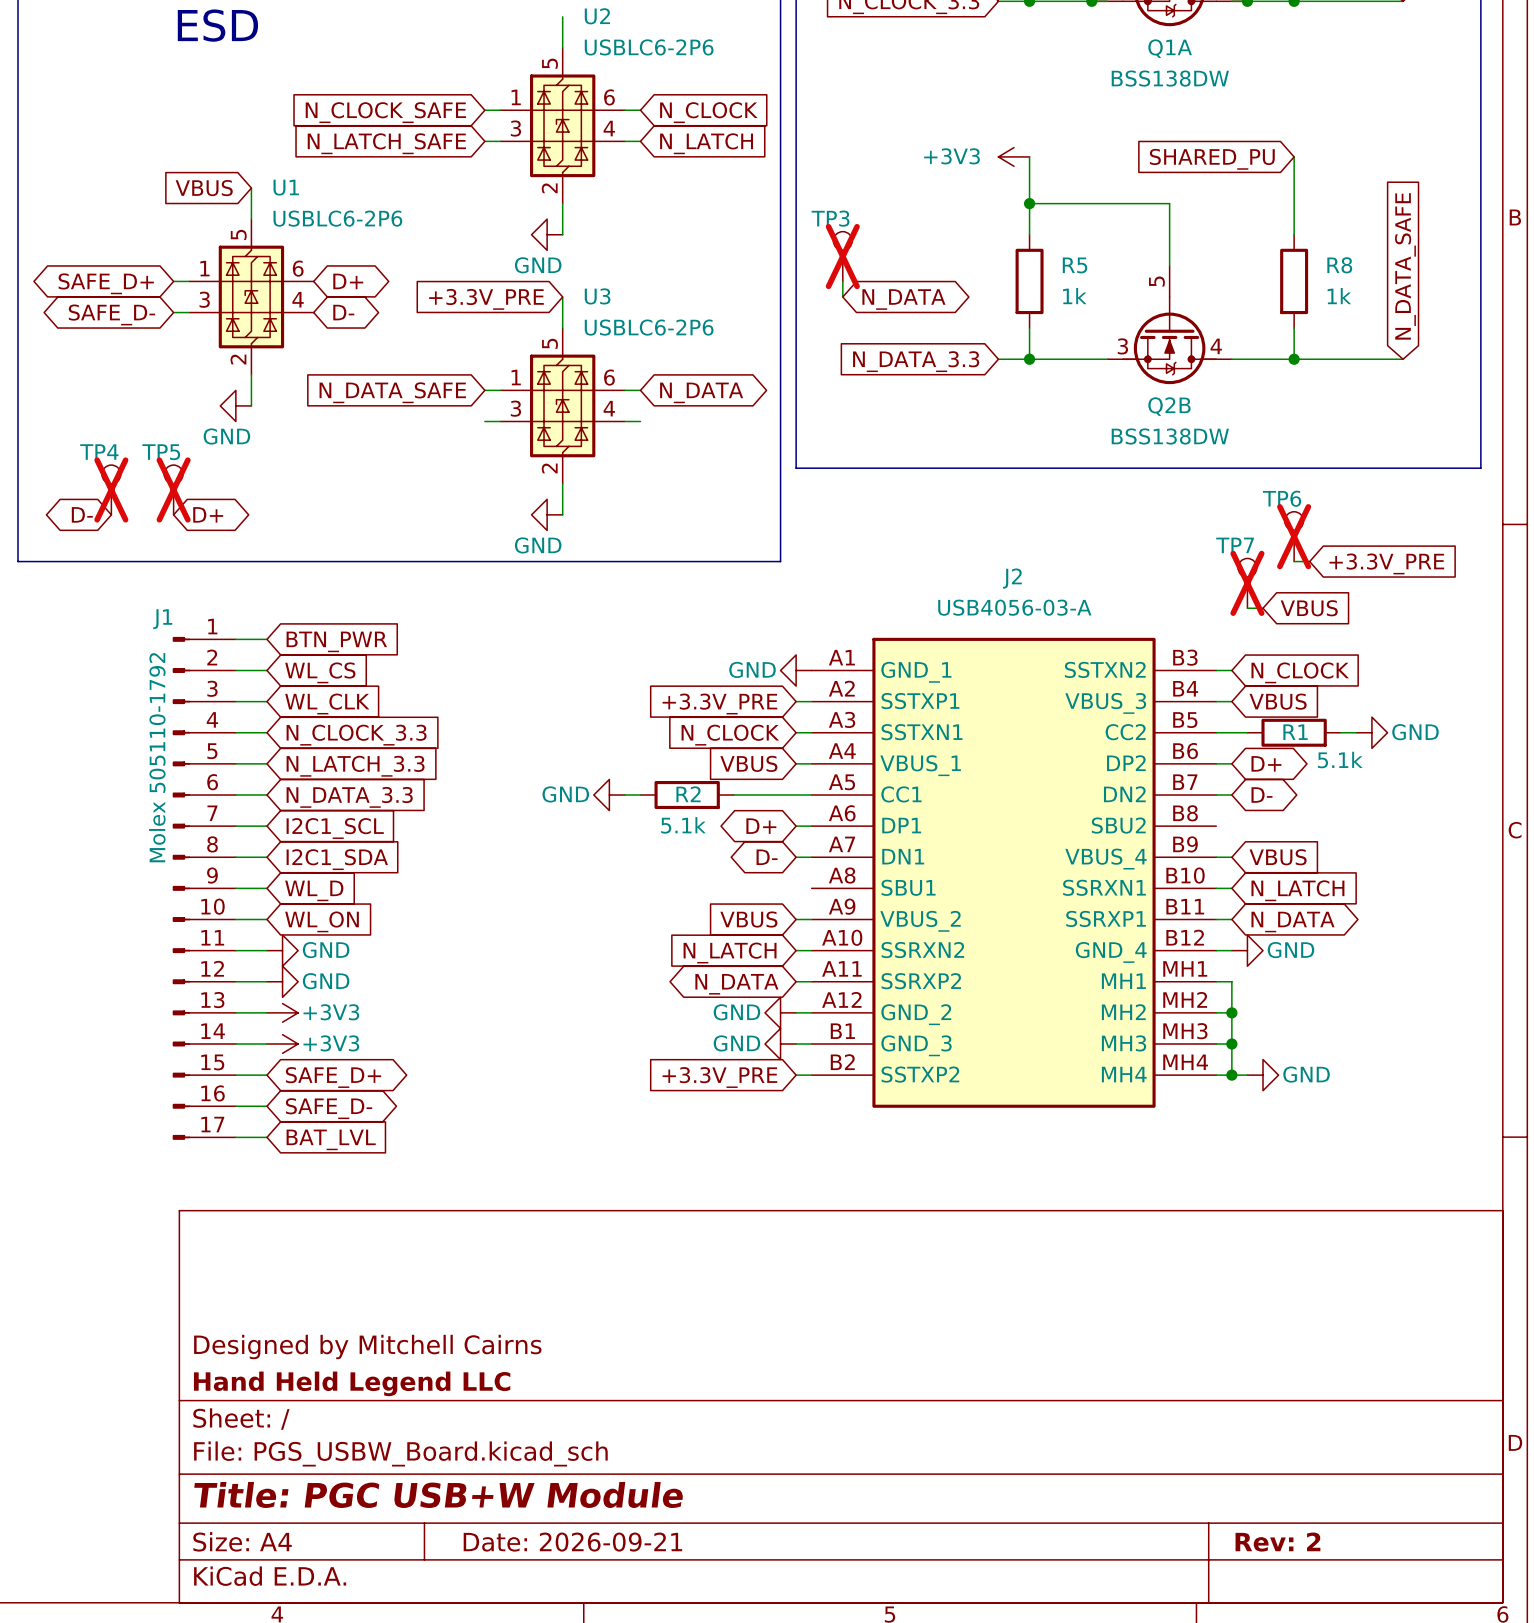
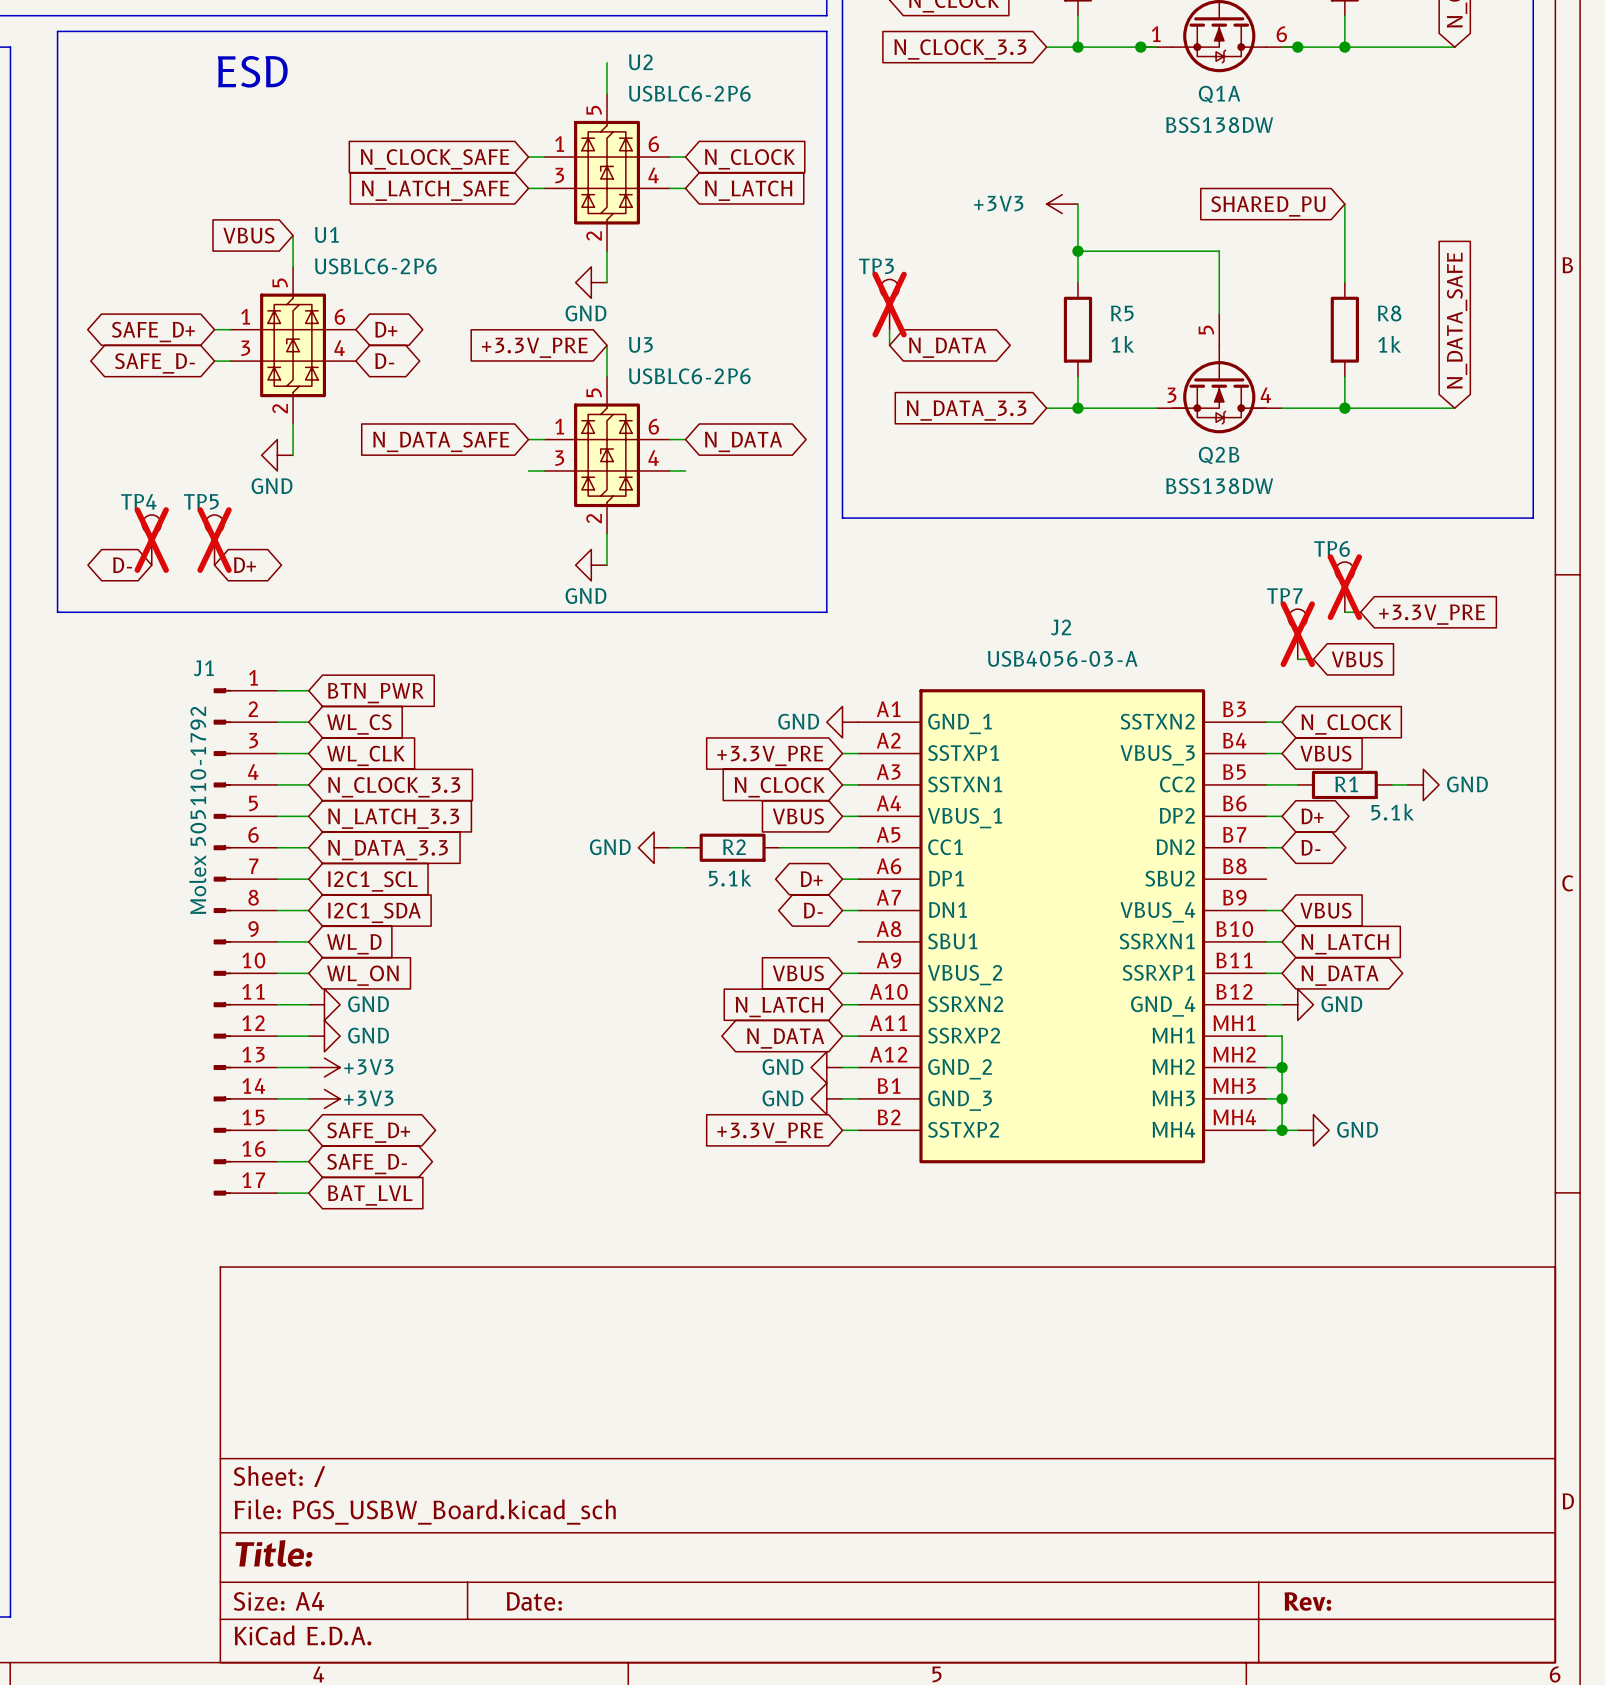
title block: Designed by Mitchell Cairns (367, 1347) -> none
title block: Hand Held Legend LLC (352, 1383) -> none
title block: Title: PGC USB+W Module (438, 1494) -> Title: (274, 1553)
title block: Date: 2026-09-21 (572, 1542) -> Date: (534, 1601)
title block: Rev: 2 (1277, 1542) -> Rev: (1307, 1601)

